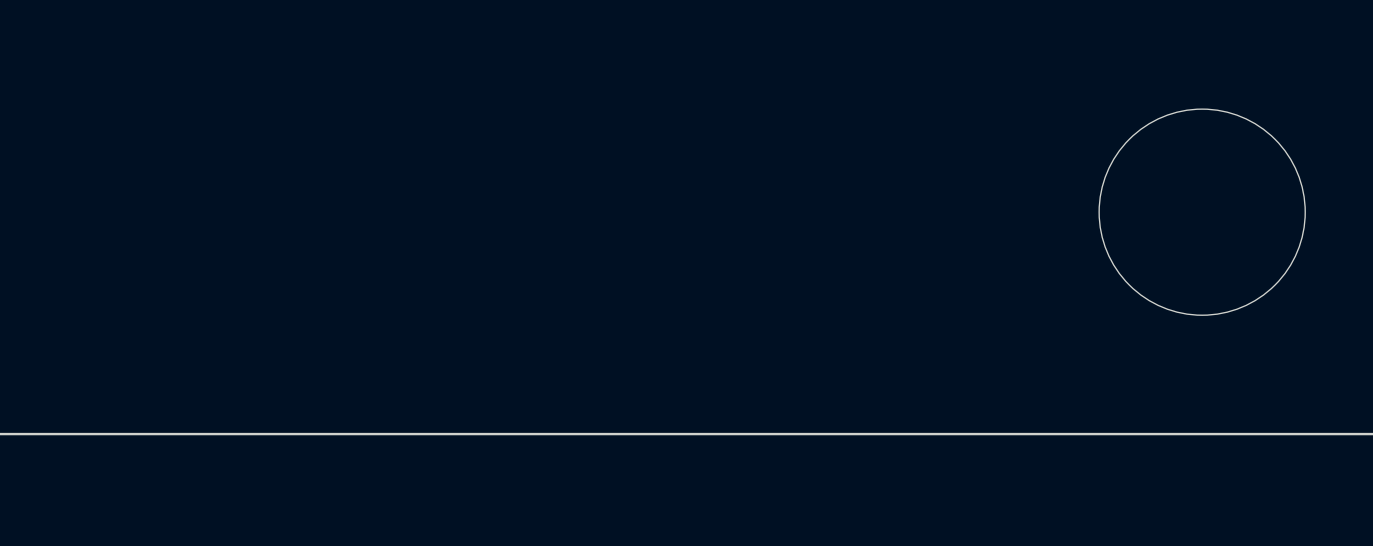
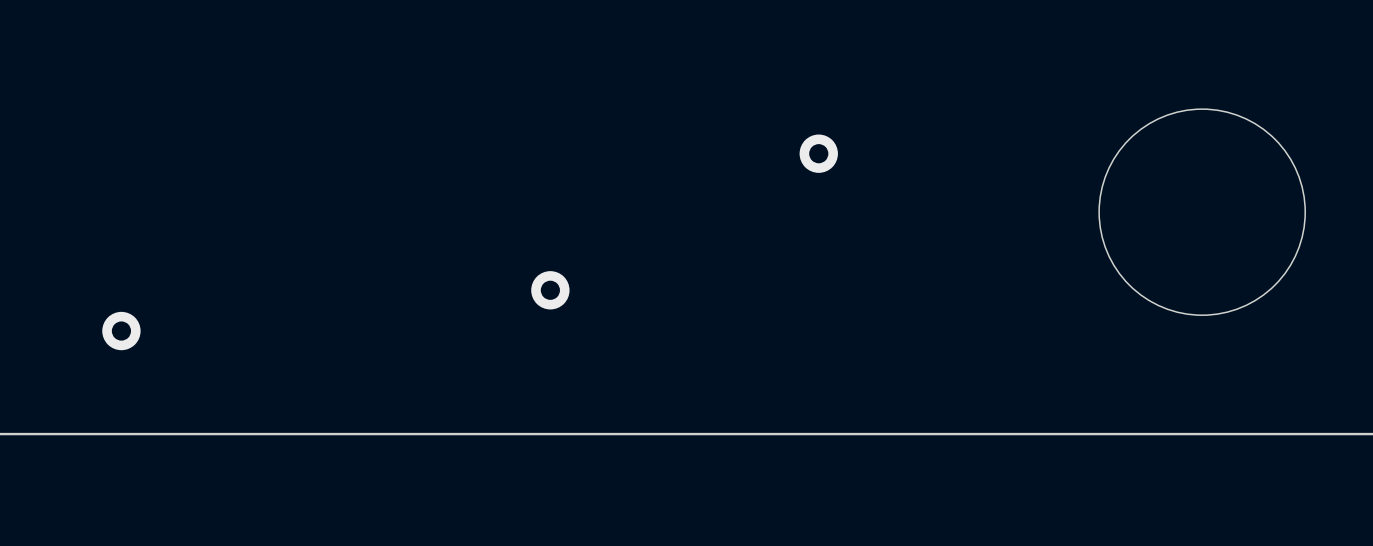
via: none -> (818, 153)
via: none -> (550, 290)
via: none -> (121, 331)

